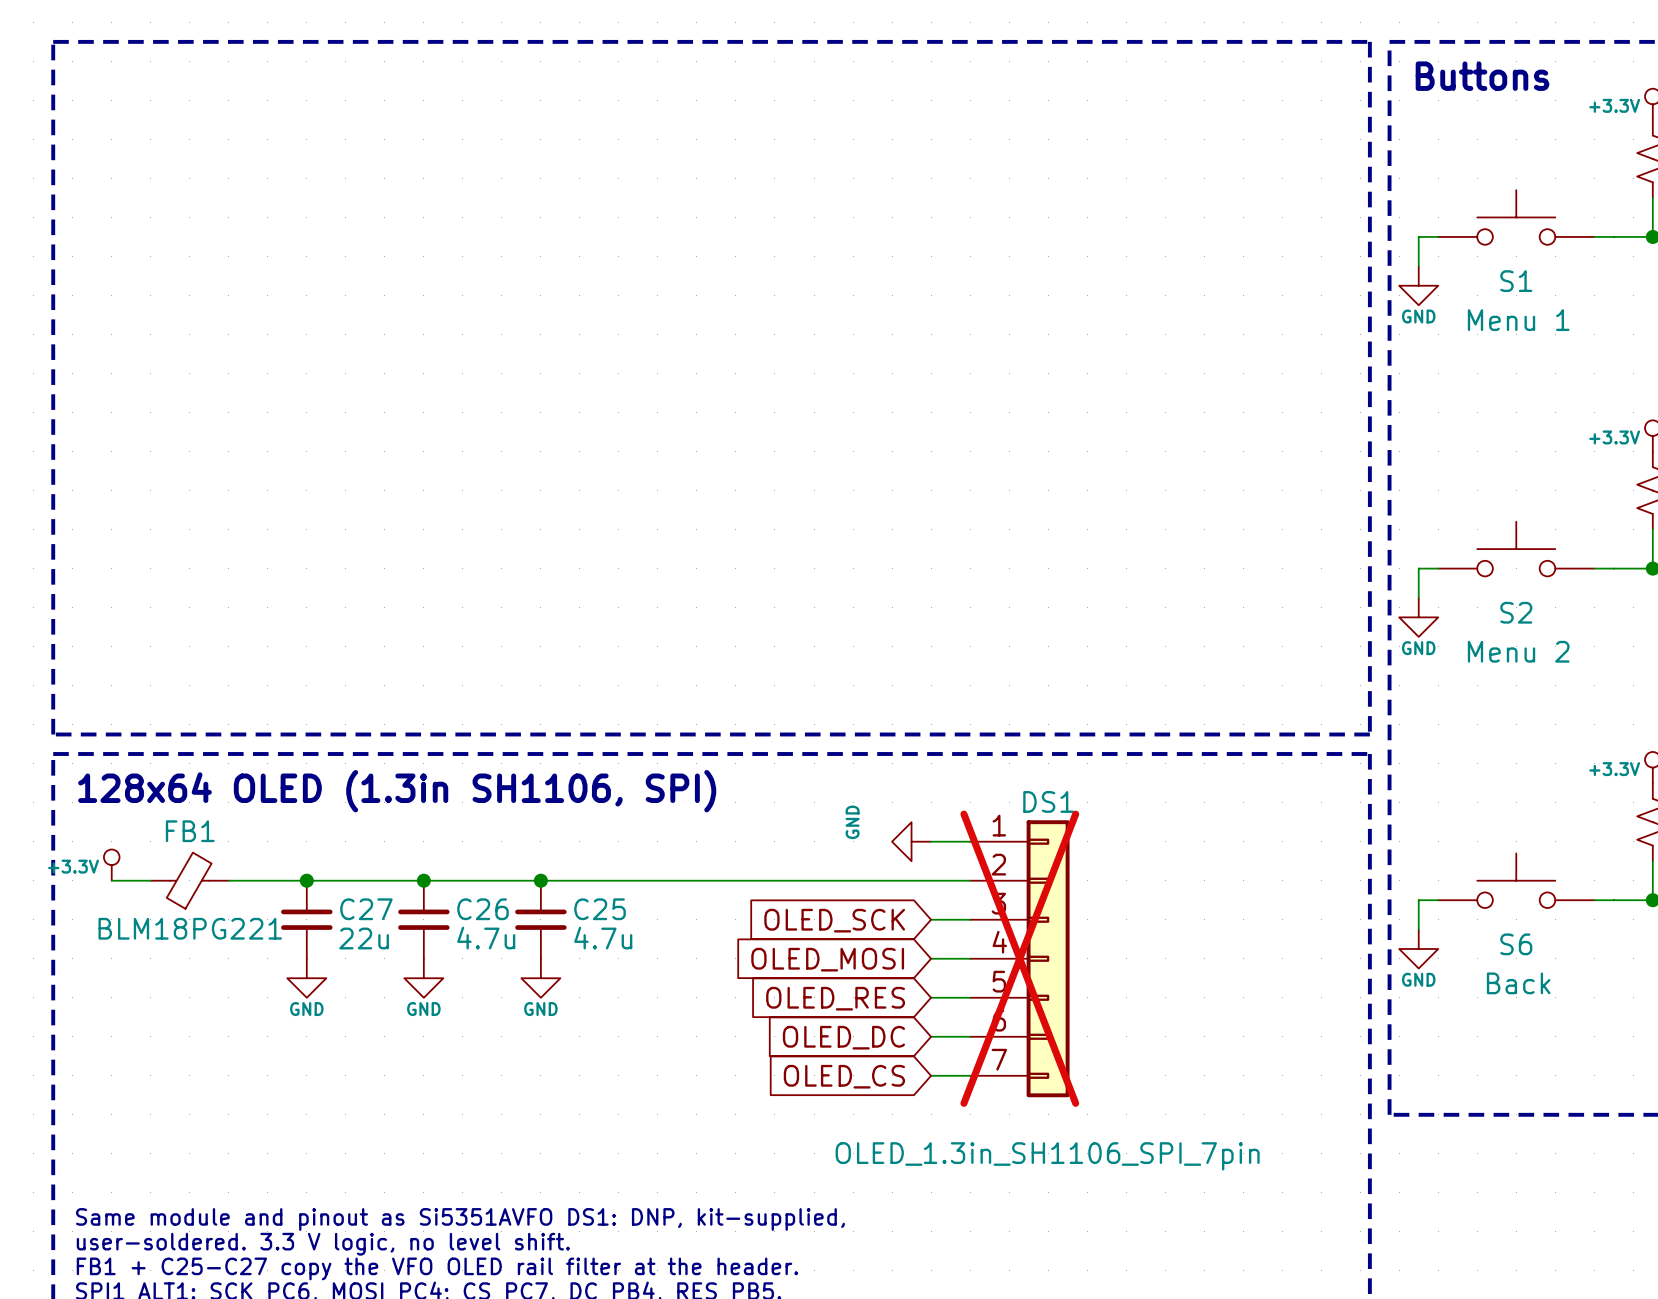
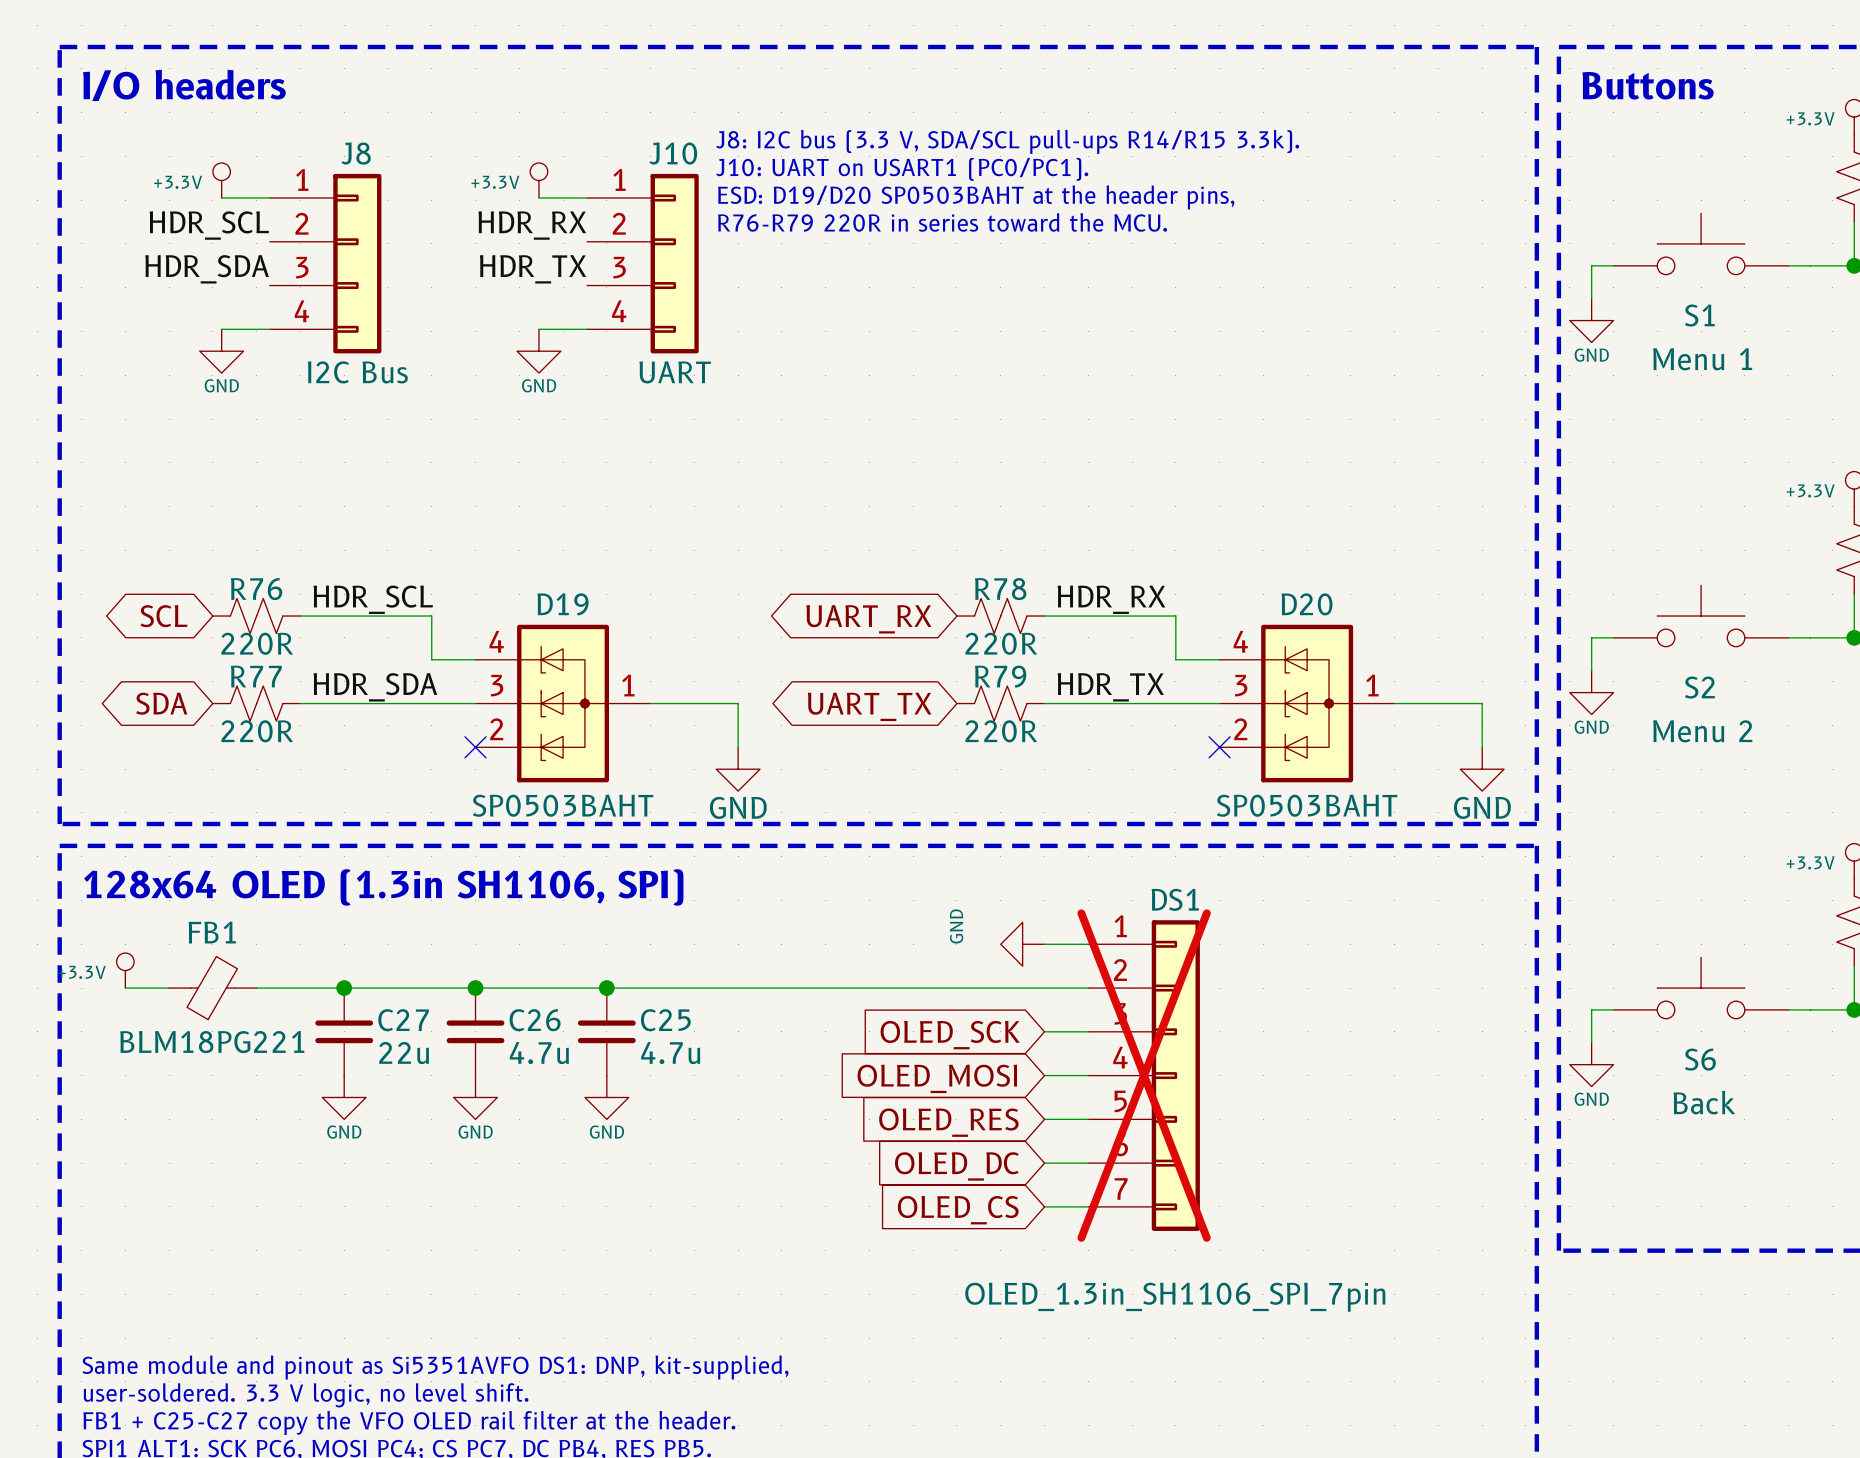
text: none -> I/O headers (184, 85)
text: none -> J8: I2C bus (3.3 V, SDA/SCL pull-ups R14/R15 3.3k). (1007, 141)
text: none -> J10: UART on USART1 (PC0/PC1). (902, 169)
power symbol: none -> +3.3V (221, 180)
power symbol: none -> +3.3V (538, 180)
wire: none -> (221, 198) (269, 198)
wire: none -> (538, 198) (587, 198)
text: none -> ESD: D19/D20 SP0503BAHT at the header pins, (976, 197)
text: none -> R76-R79 220R in series toward the MCU. (942, 222)
label: none -> HDR_SCL (209, 225)
label: none -> HDR_RX (532, 225)
J8: none -> I2C Bus (325, 263)
J10: none -> UART (642, 263)
label: none -> HDR_SDA (207, 269)
label: none -> HDR_TX (533, 269)
wire: none -> (221, 329) (269, 329)
wire: none -> (538, 329) (587, 329)
power symbol: none -> GND (221, 351)
power symbol: none -> GND (538, 351)
label: none -> HDR_SCL (373, 599)
label: none -> HDR_RX (1111, 599)
global label: none -> SCL (163, 616)
R76: none -> 220R (256, 616)
wire: none -> (300, 616) (431, 616) (431, 659) (475, 659)
R78: none -> 220R (1000, 616)
wire: none -> (1044, 616) (1175, 616) (1175, 659) (1219, 659)
global label: none -> UART_RX (868, 619)
label: none -> HDR_SDA (375, 687)
label: none -> HDR_TX (1110, 687)
global label: none -> SDA (161, 703)
R77: none -> 220R (256, 703)
wire: none -> (300, 703) (475, 703)
D19: none -> SP0503BAHT (563, 703)
wire: none -> (650, 703) (738, 703) (738, 747)
R79: none -> 220R (1000, 703)
wire: none -> (1044, 703) (1219, 703)
D20: none -> SP0503BAHT (1307, 703)
wire: none -> (1394, 703) (1482, 703) (1482, 747)
global label: none -> UART_TX (869, 706)
no-connect mark: none -> (475, 747)
no-connect mark: none -> (1219, 747)
power symbol: none -> GND (738, 769)
power symbol: none -> GND (1482, 769)

